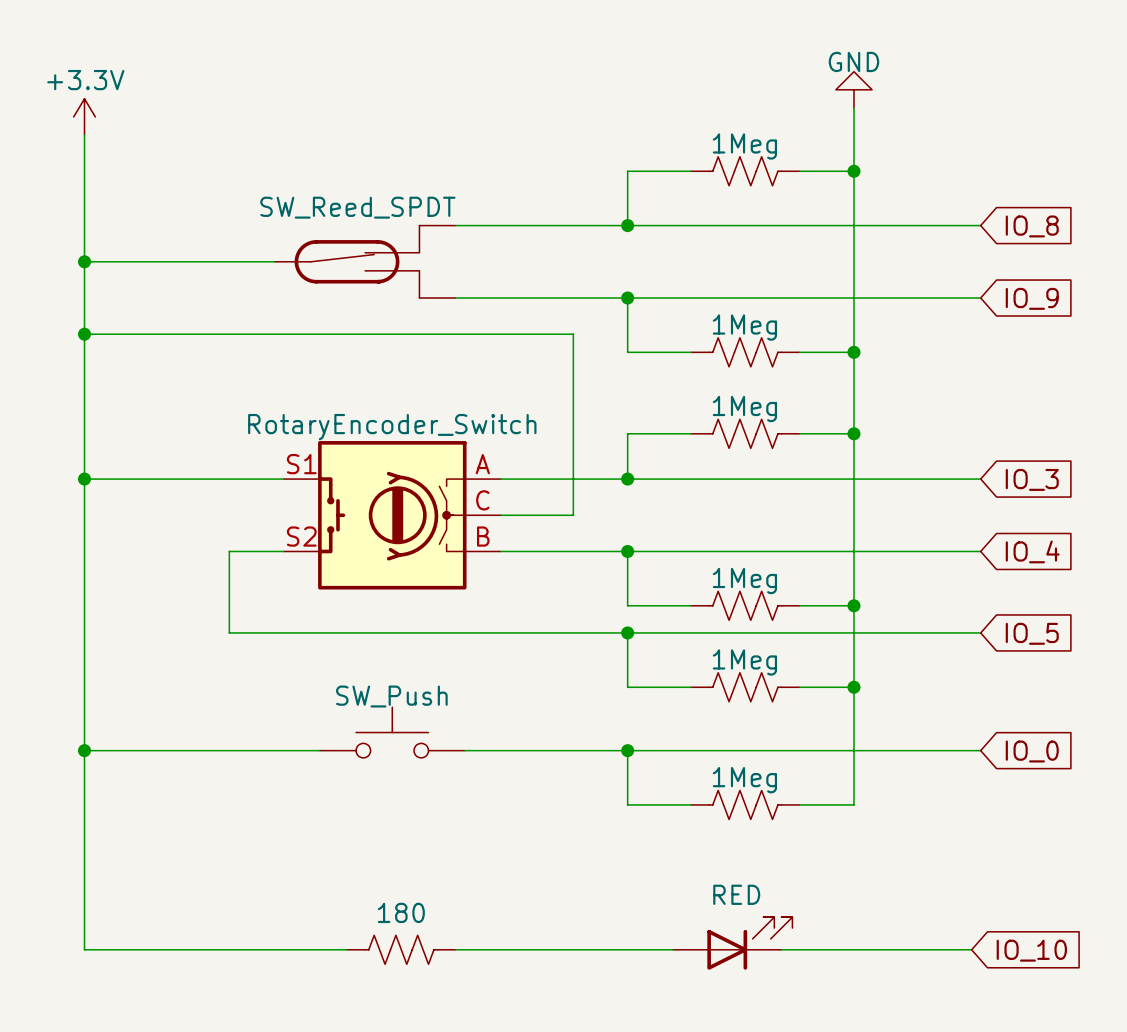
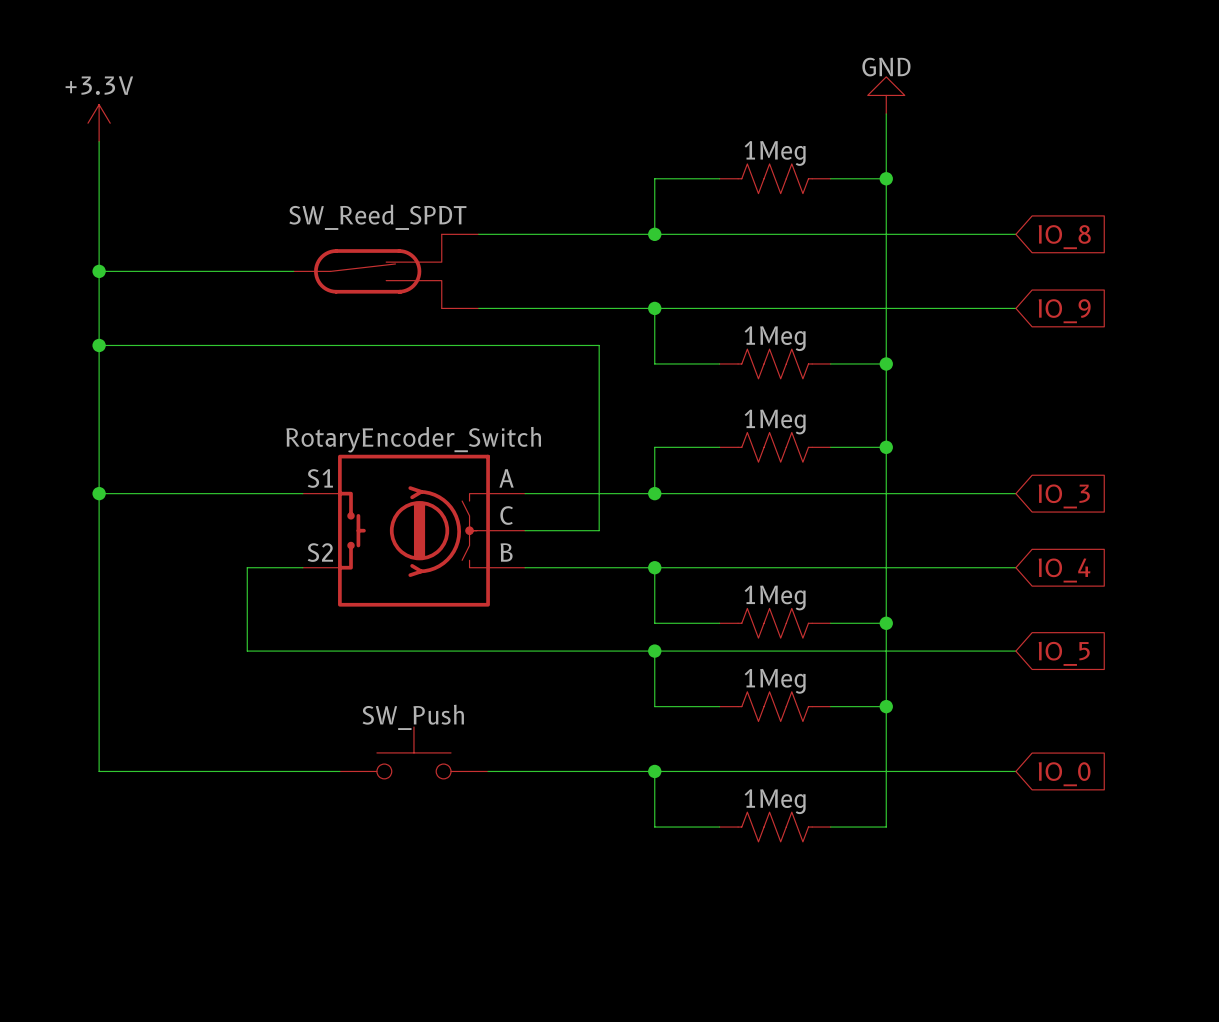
wire: (84, 750) (84, 949) (347, 949) -> none
junction: (84, 750) -> none
part: RED (732, 943) -> none
part: 180 (401, 949) -> none
wire: (455, 949) (672, 949) -> none
wire: (781, 949) (971, 949) -> none
global label: IO_10 (1031, 950) -> none

